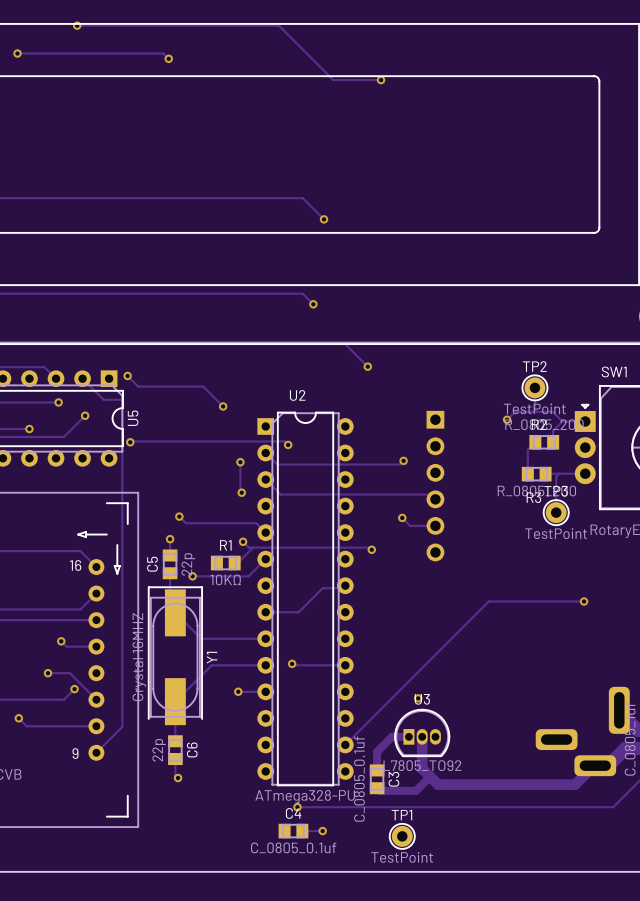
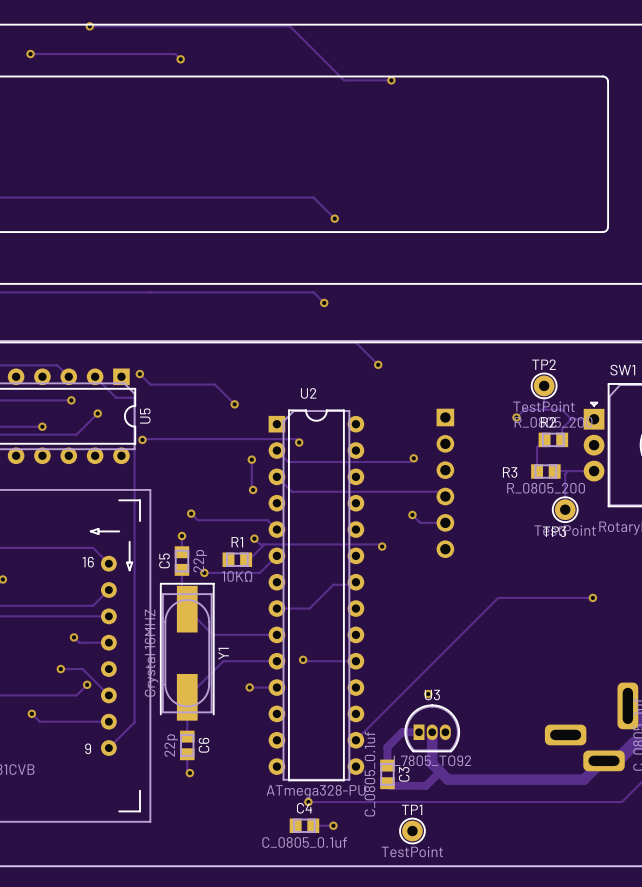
TP3 name position: TP3 (556, 491) -> TP3 (554, 531)
R3 name position: R3 (533, 497) -> R3 (510, 472)

